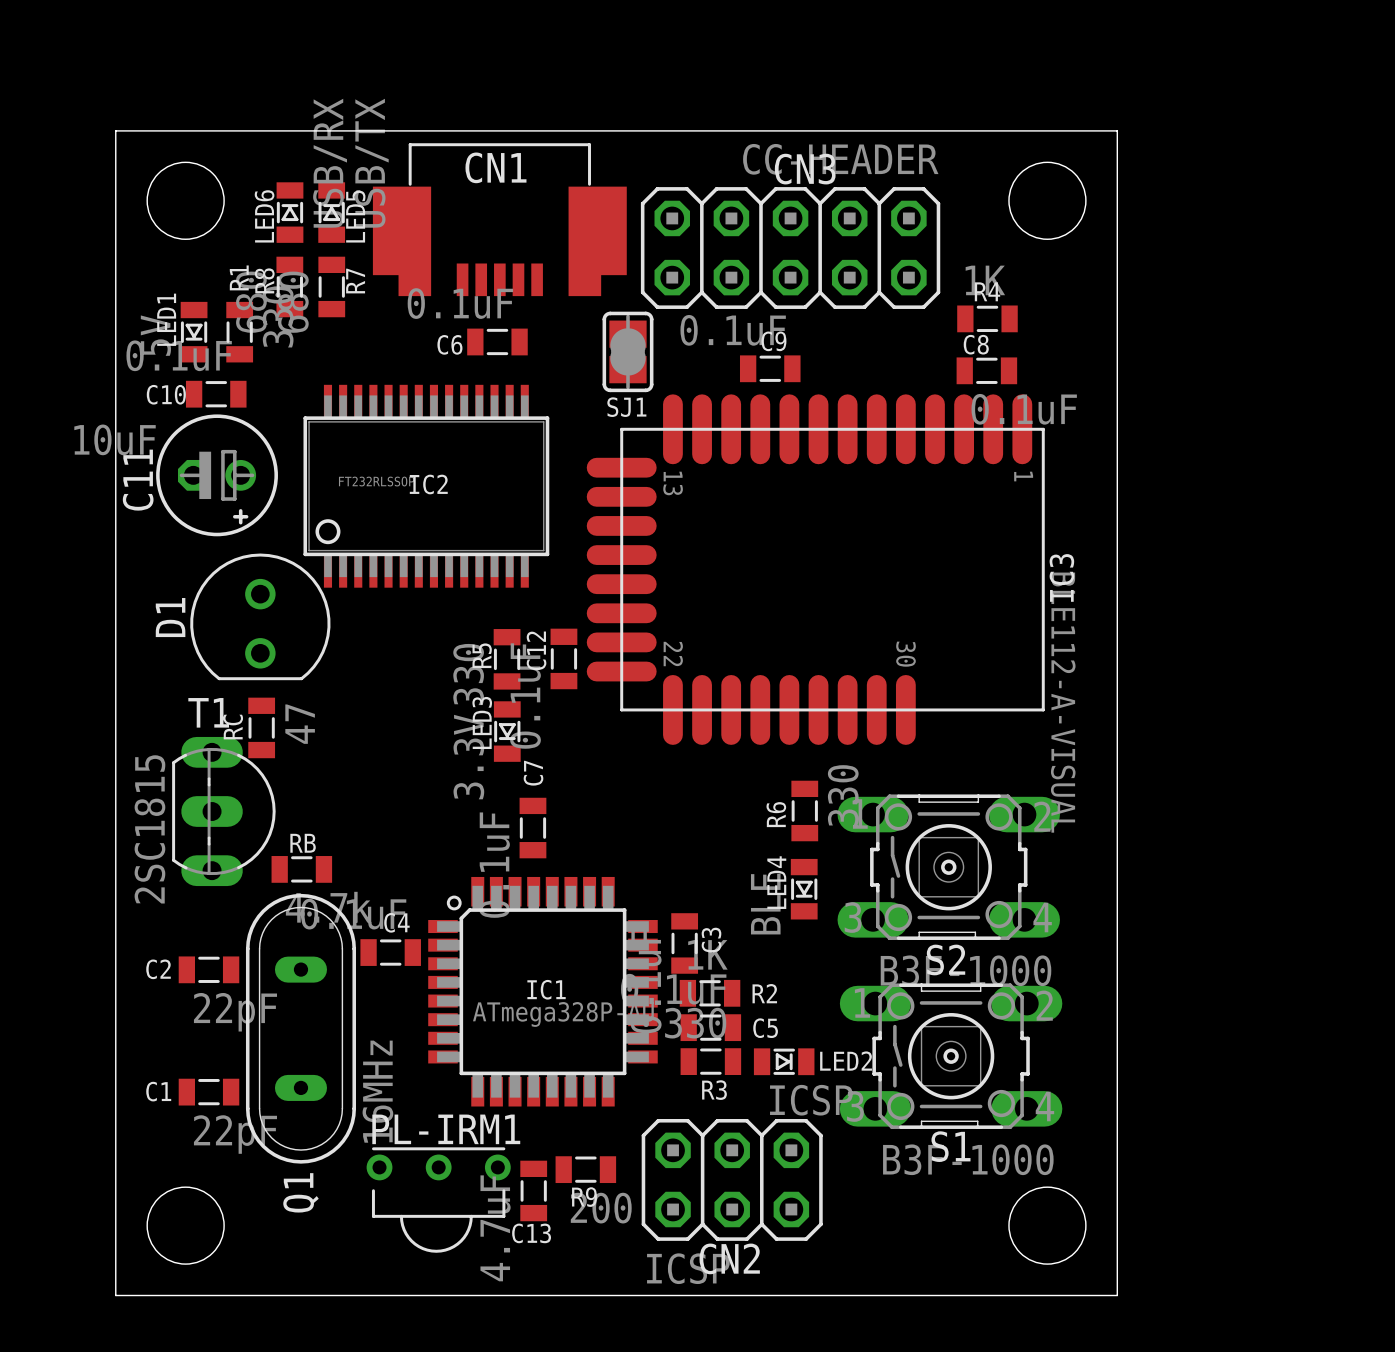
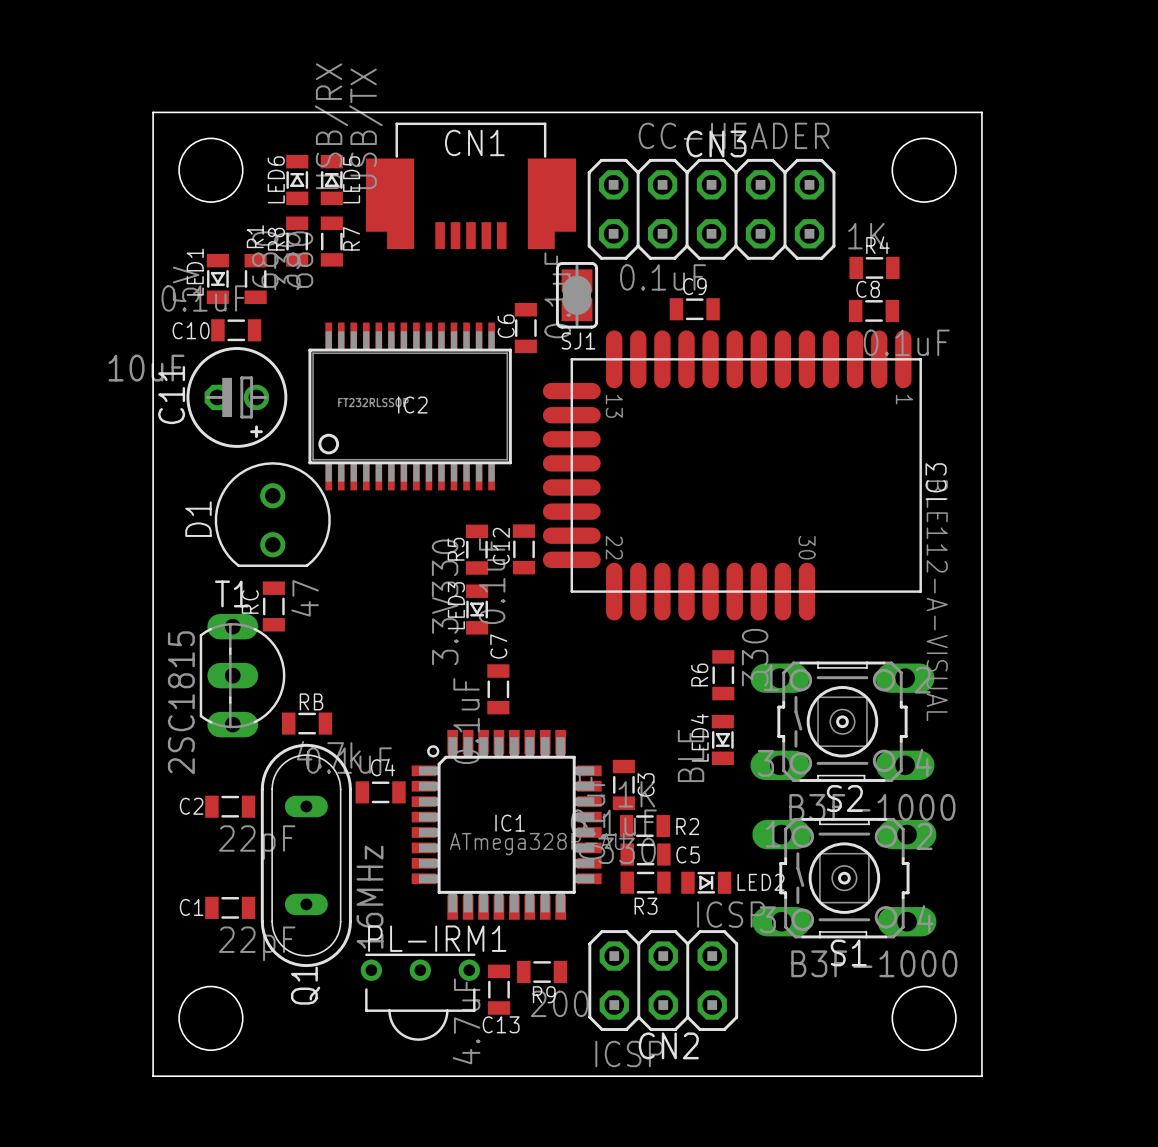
C6 rotation: 0° (497, 341) -> 90° clockwise (525, 328)
C6 position: (497, 341) -> (525, 328)

